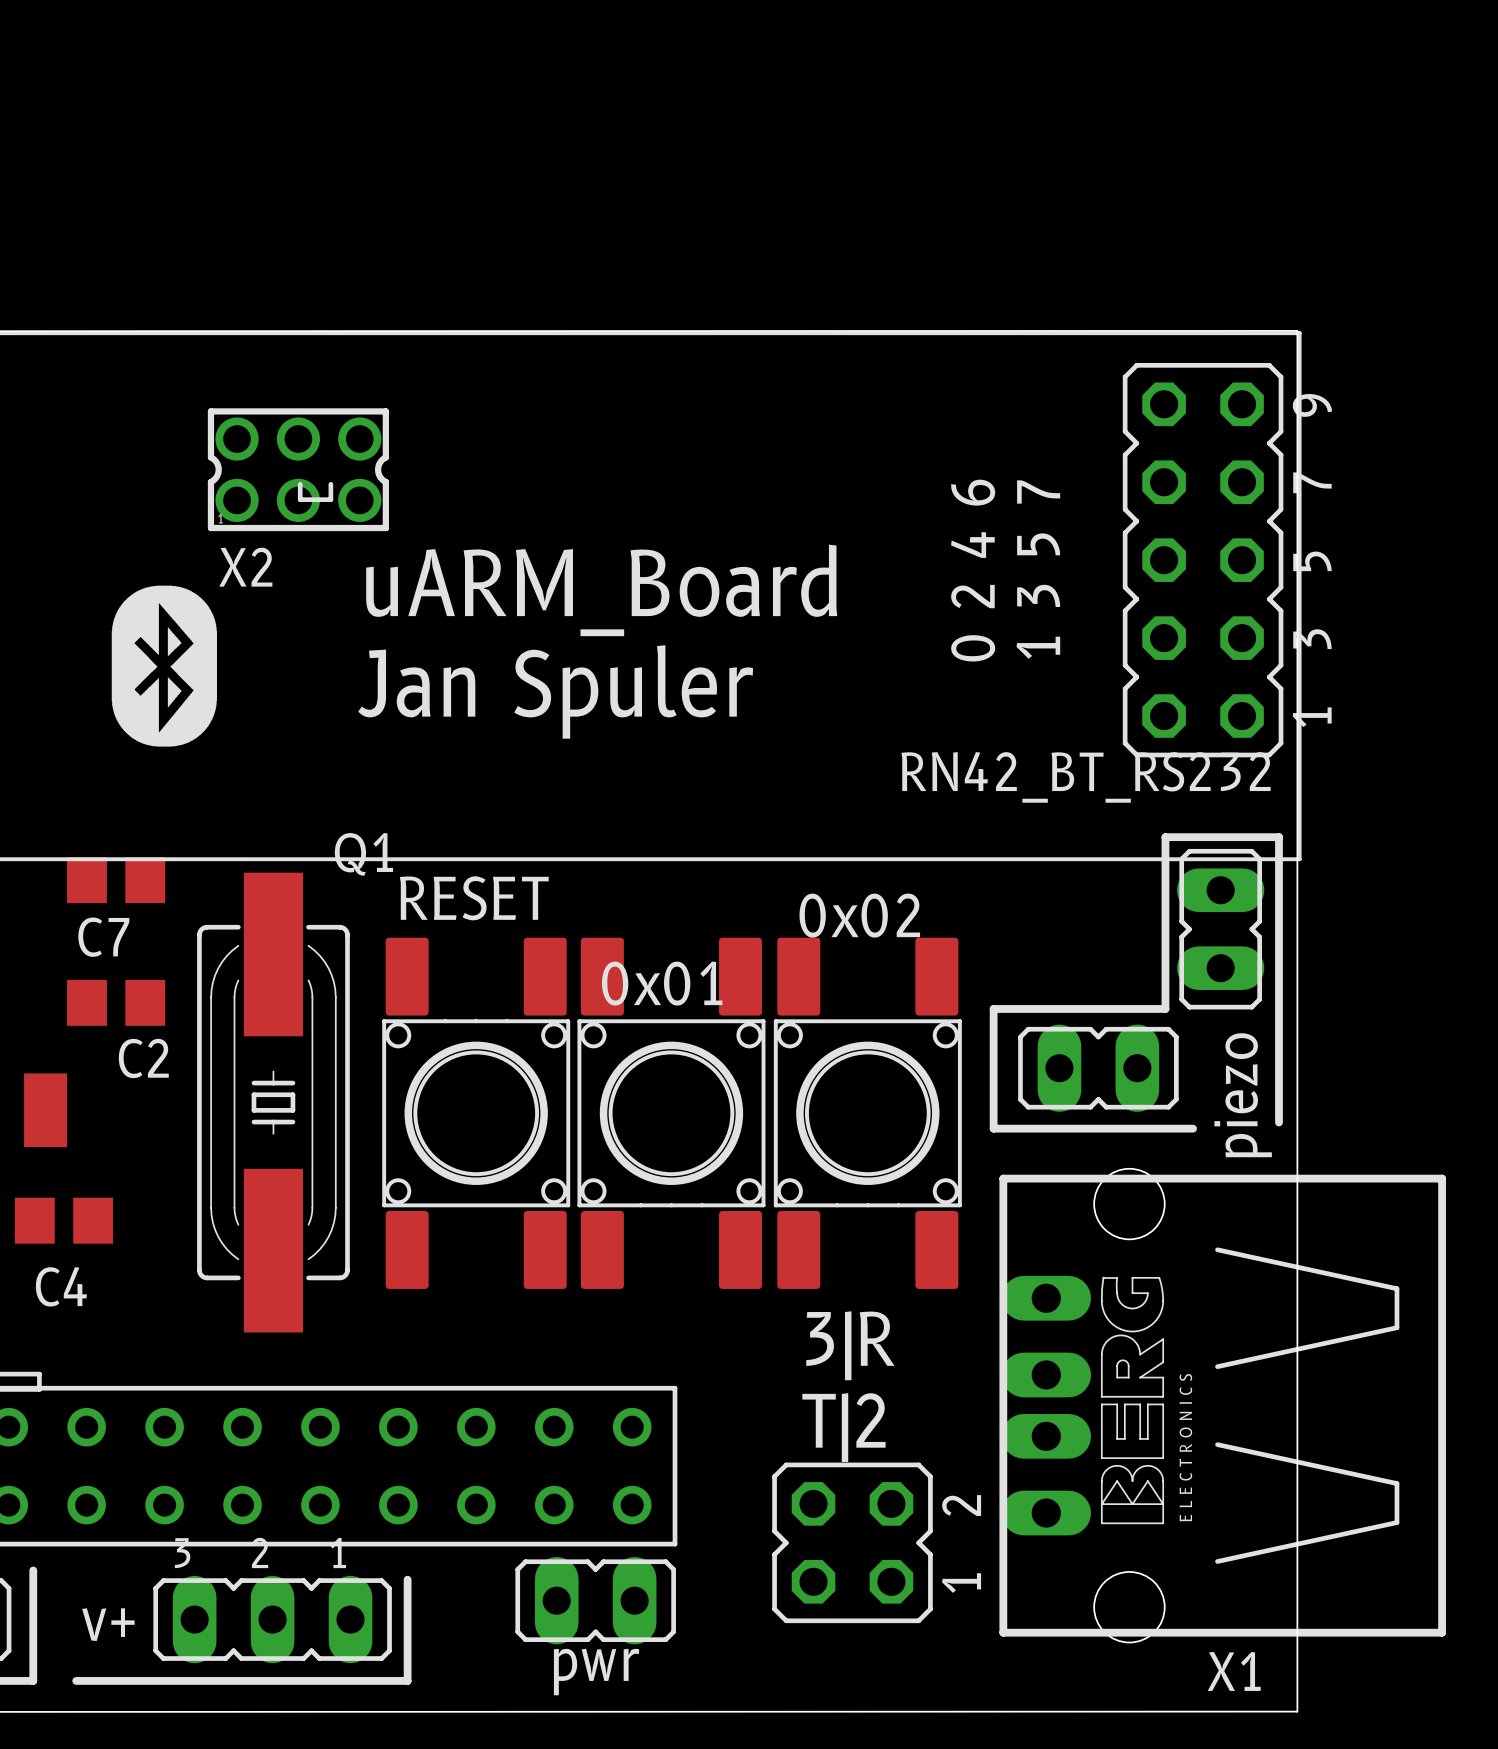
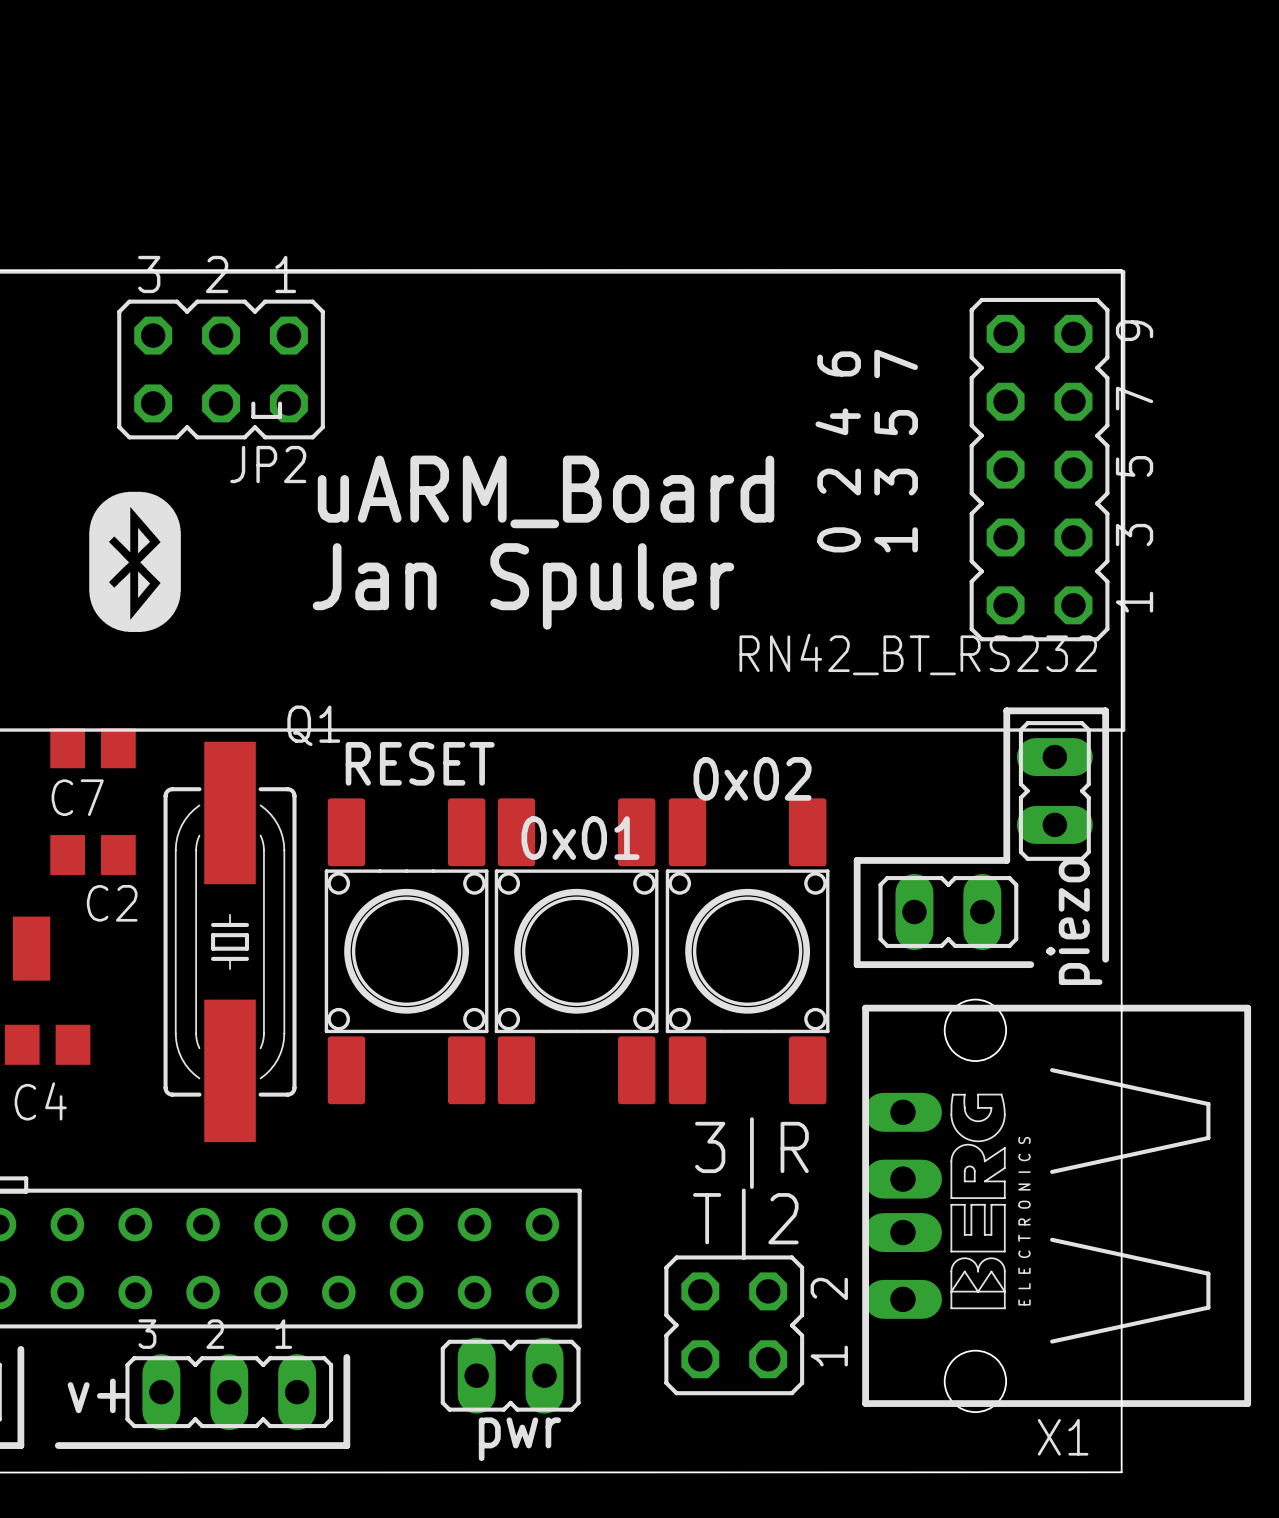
JP2: none -> (221, 369)
X2: (298, 469) -> none

